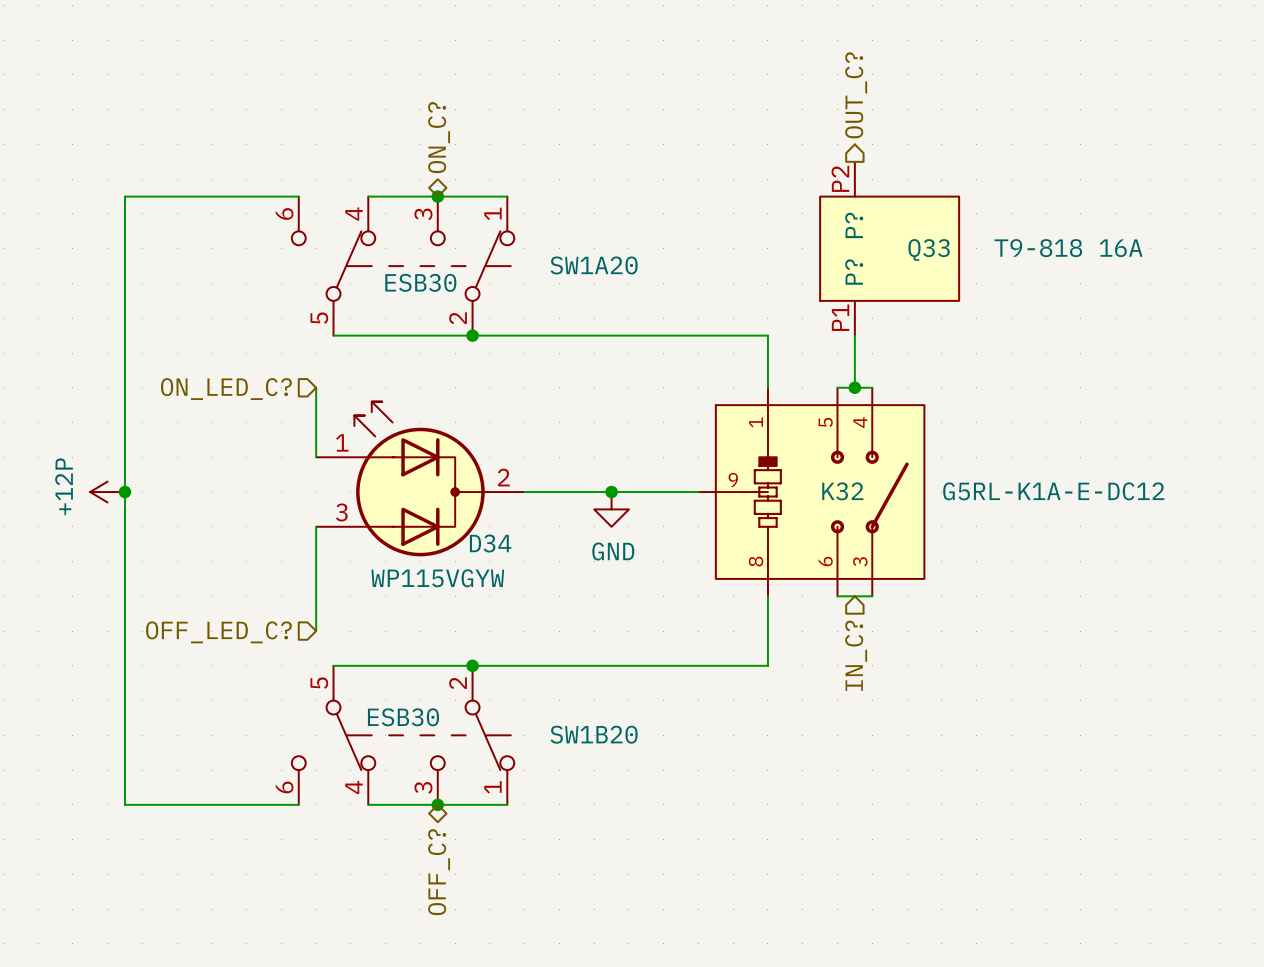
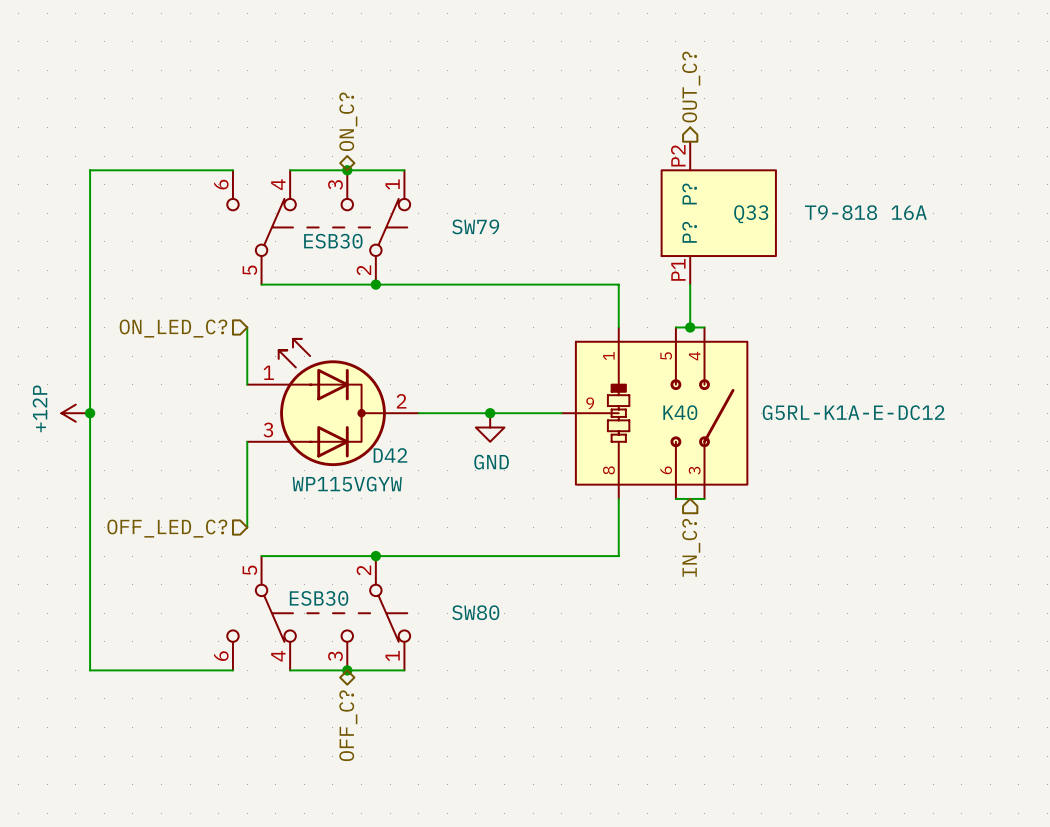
SW1A20 name: SW1A20 (594, 265) -> SW79 (475, 226)
K32 name: K32 (842, 491) -> K40 (680, 412)
D34 name: D34 (490, 543) -> D42 (390, 455)
SW1B20 name: SW1B20 (594, 734) -> SW80 (475, 612)

